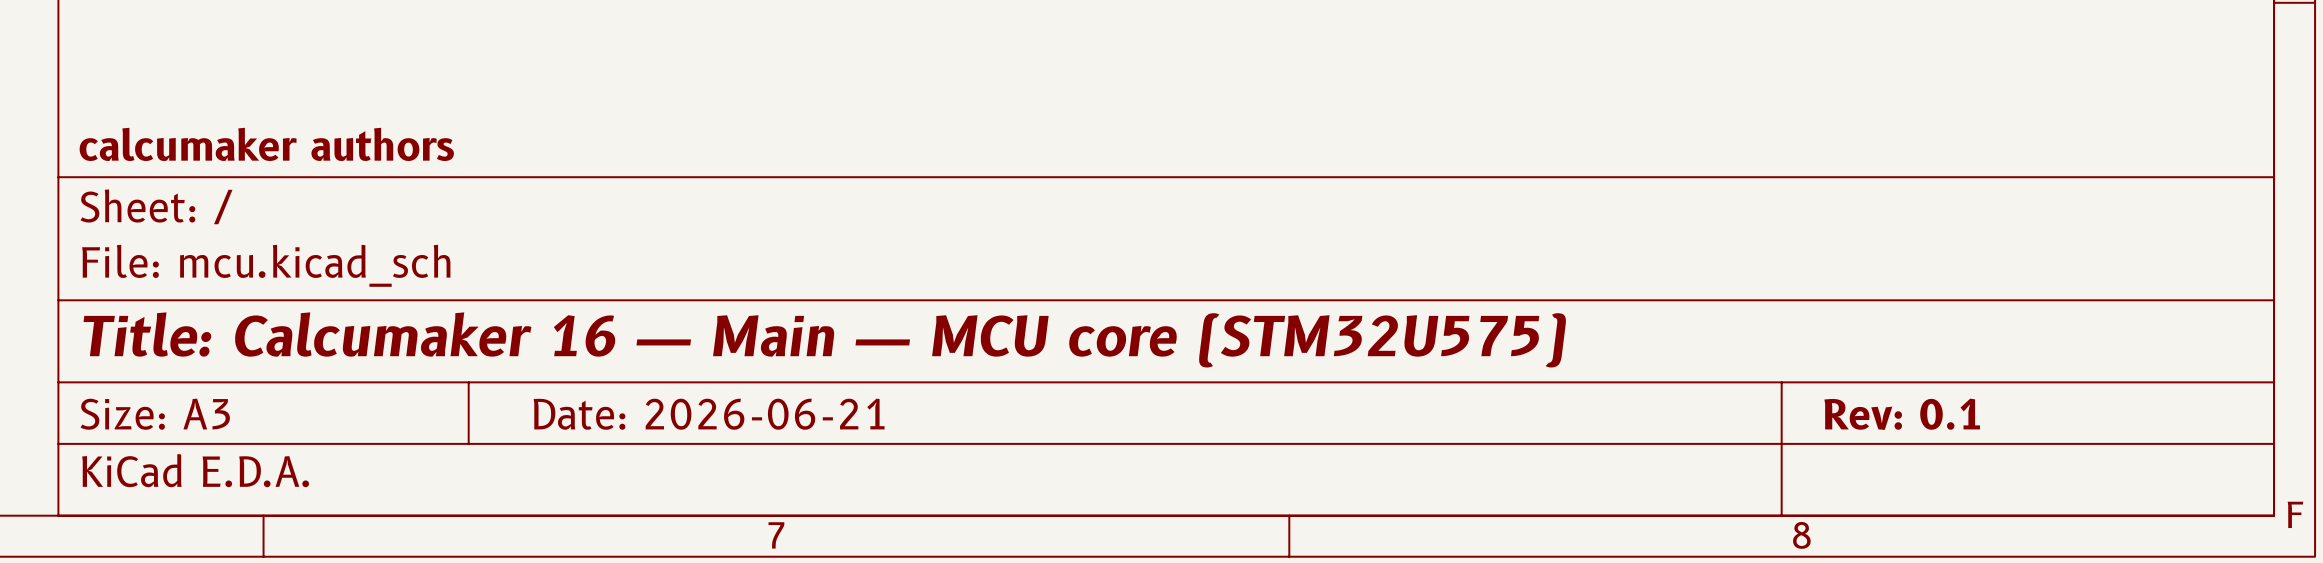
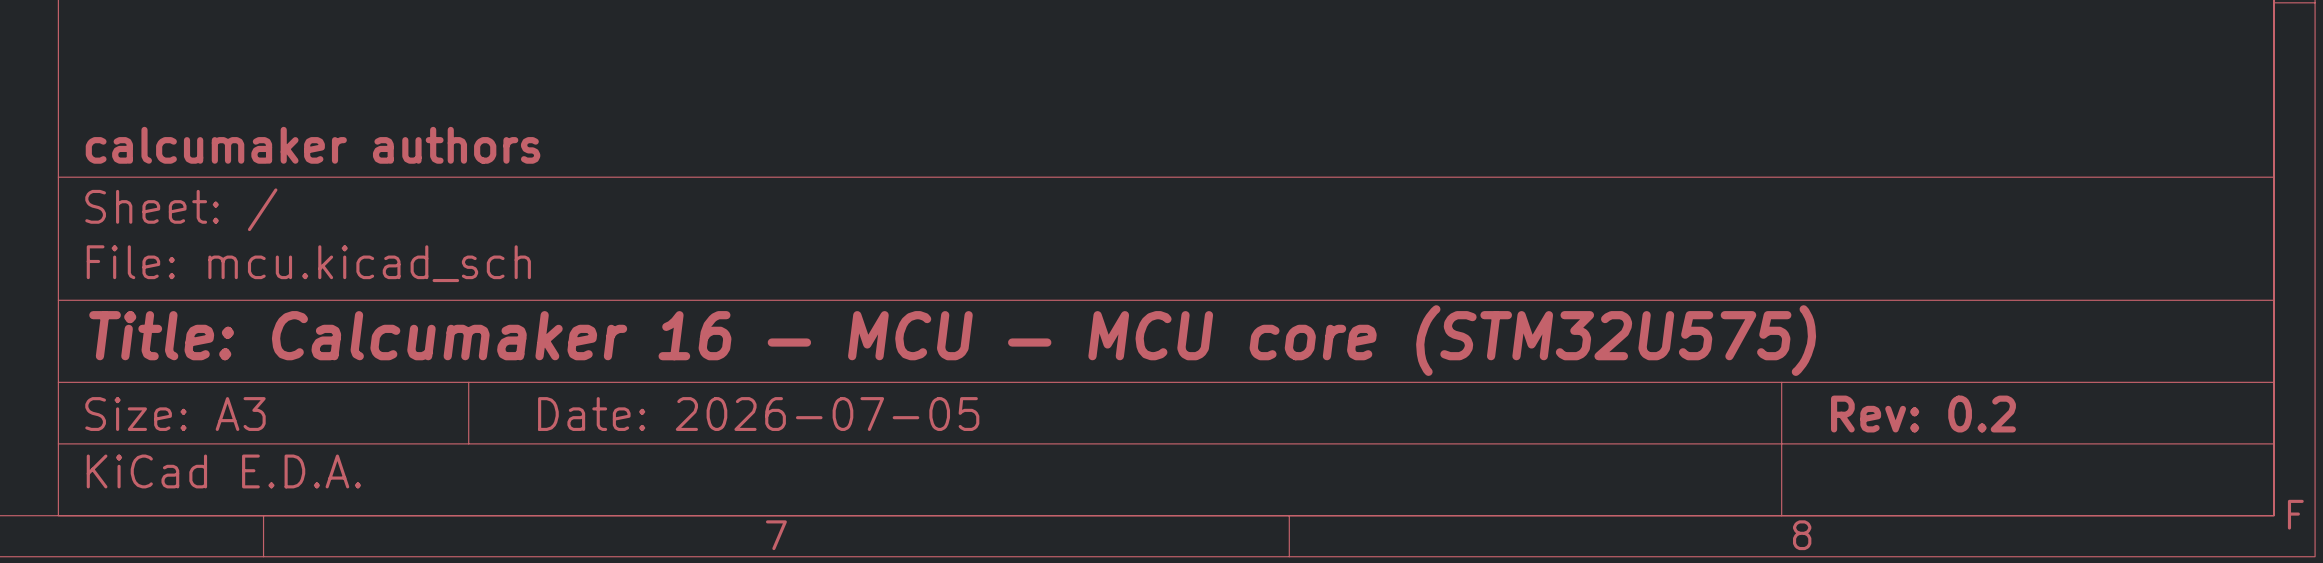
title block: Title: Calcumaker 16 — Main — MCU core (STM32U575) (824, 339) -> Title: Calcumaker 16 — MCU — MCU core (STM32U575) (952, 340)
title block: Date: 2026-06-21 (709, 414) -> Date: 2026-07-05 (758, 414)
title block: Rev: 0.1 (1902, 414) -> Rev: 0.2 (1923, 414)

